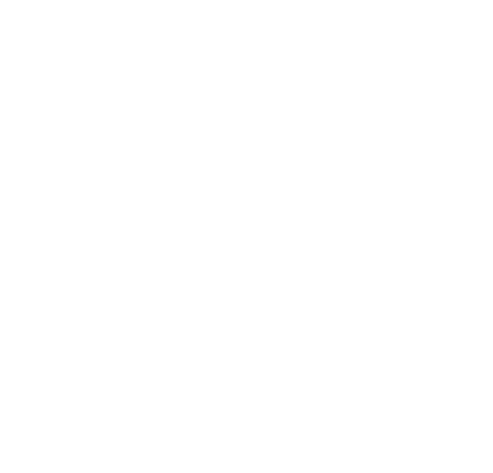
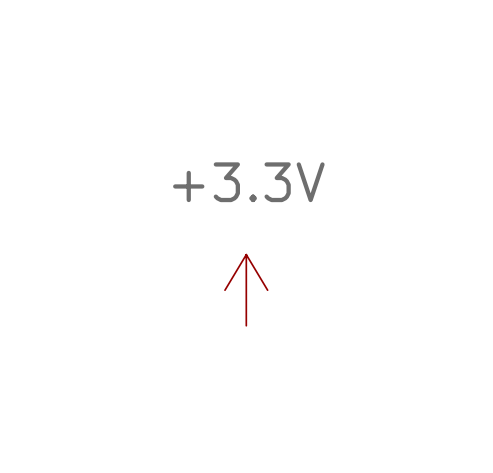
power symbol: none -> +3.3V (246, 290)

